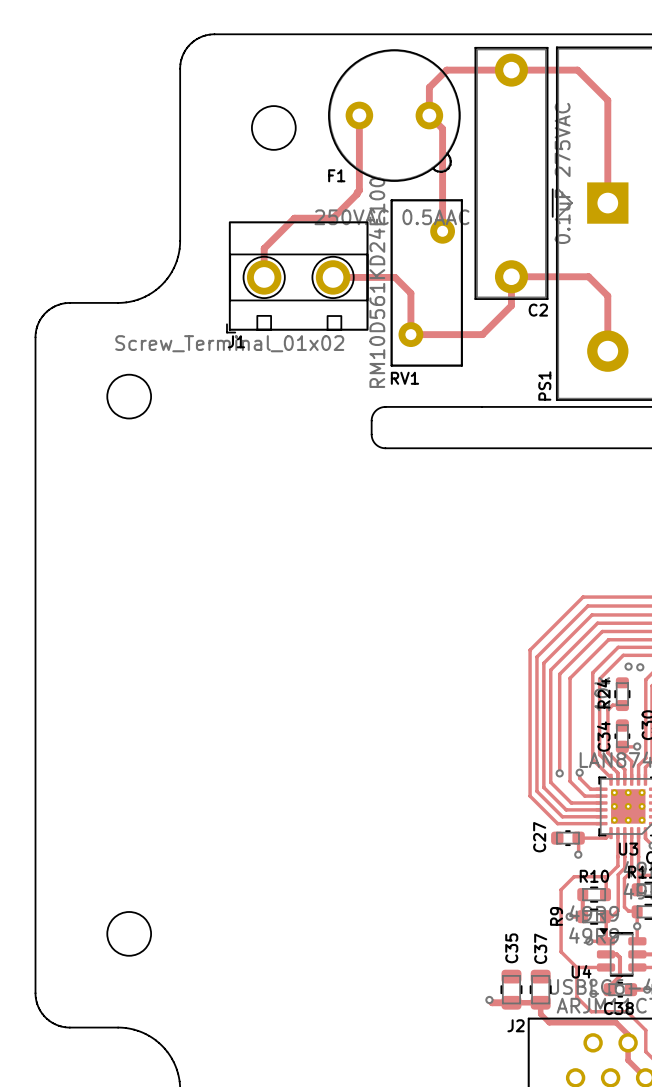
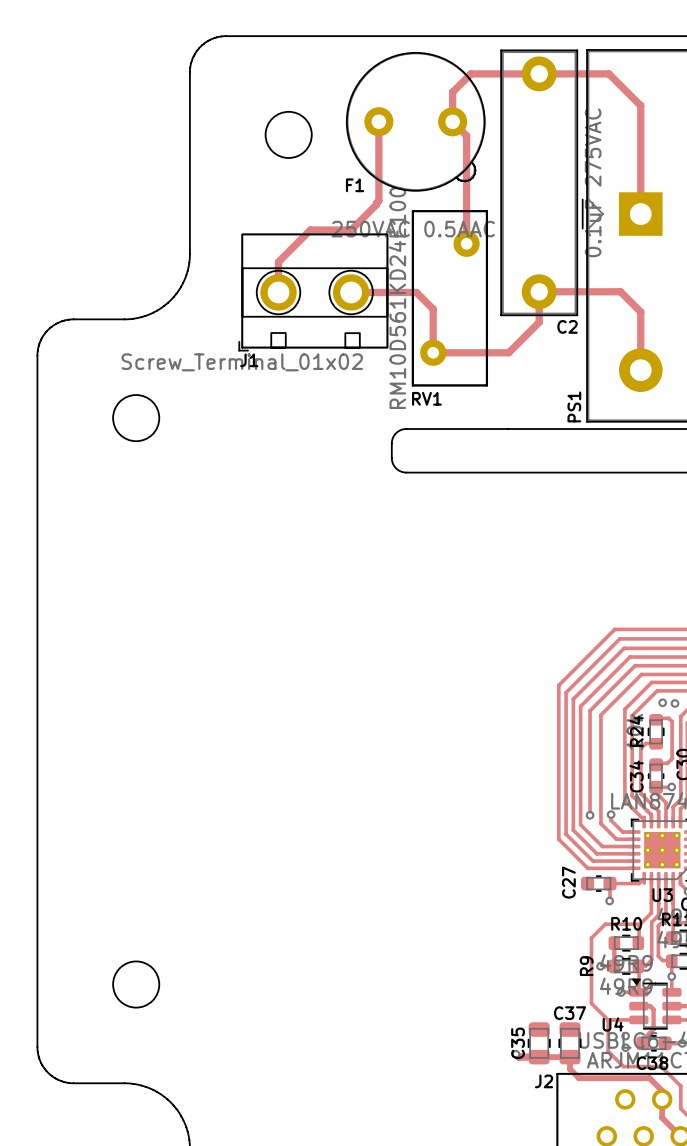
track: none -> (656, 718) (668, 718) (672, 721) (672, 758) (667, 763) (656, 763)
C35 name position: C35 (511, 948) -> C35 (518, 1043)
C37 name rotation: 0° (540, 948) -> 90° clockwise (569, 1013)

